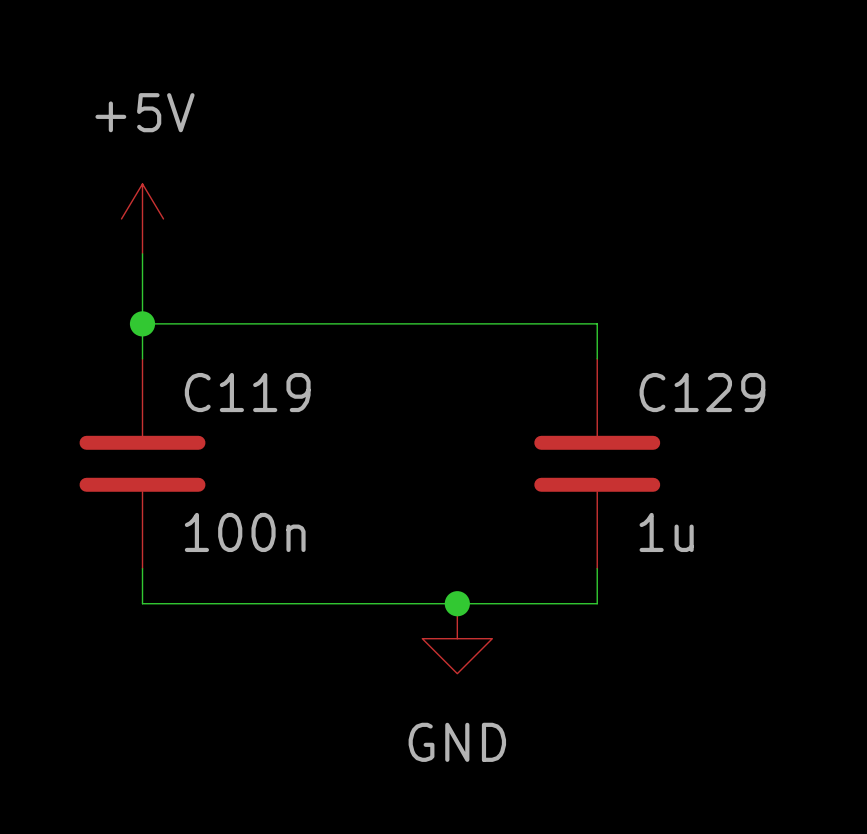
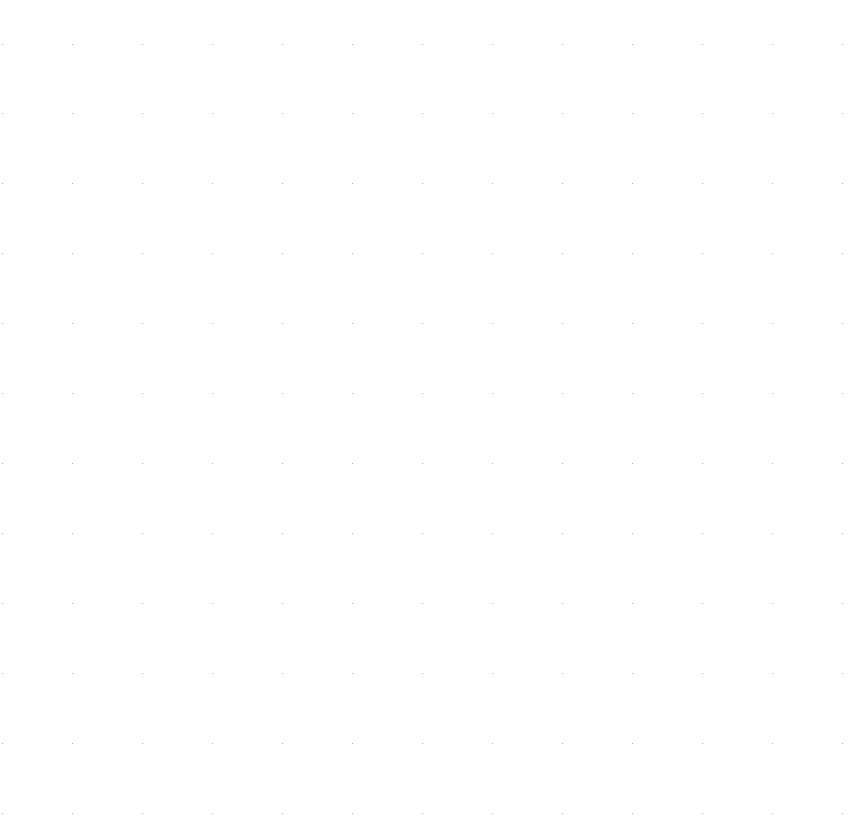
power symbol: +5V (142, 218) -> none
wire: (142, 253) (142, 358) -> none
wire: (142, 323) (597, 323) (597, 358) -> none
junction: (142, 323) -> none
C119: 100n (142, 463) -> none
C129: 1u (597, 463) -> none
wire: (142, 568) (142, 603) (597, 603) (597, 568) -> none
junction: (457, 603) -> none
power symbol: GND (457, 638) -> none

